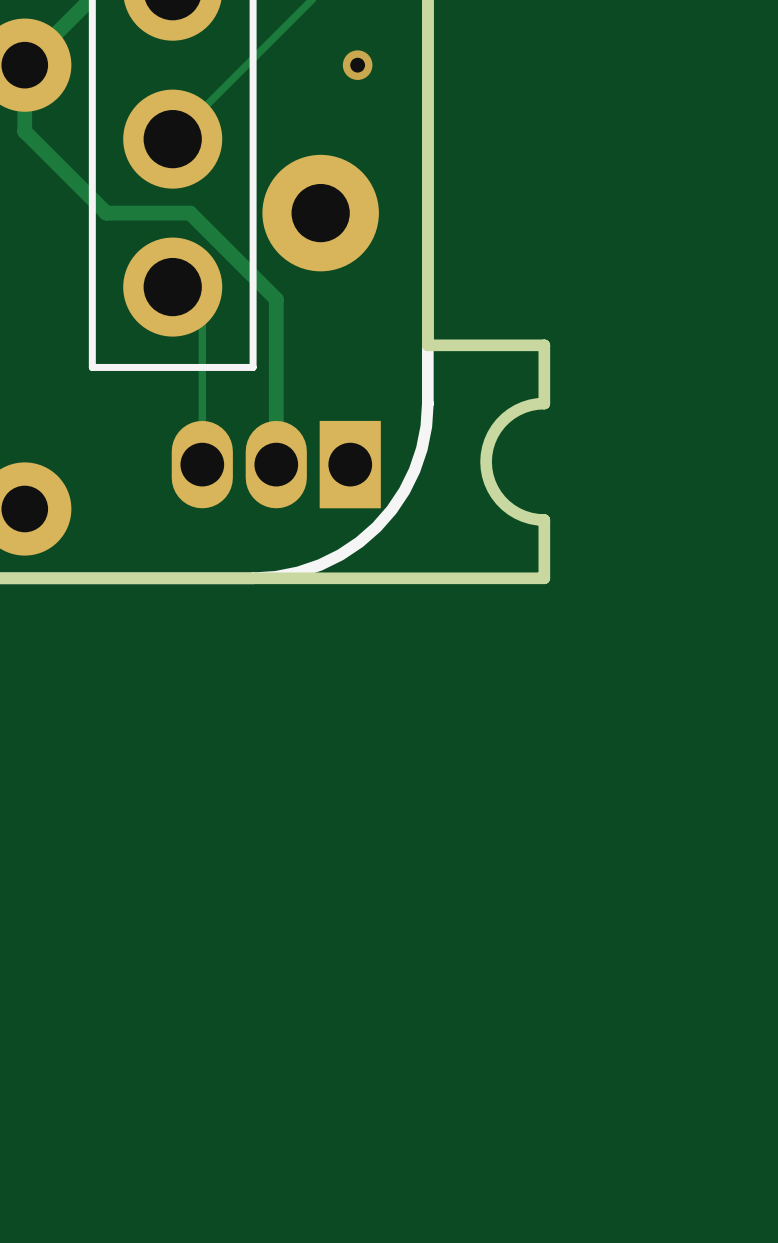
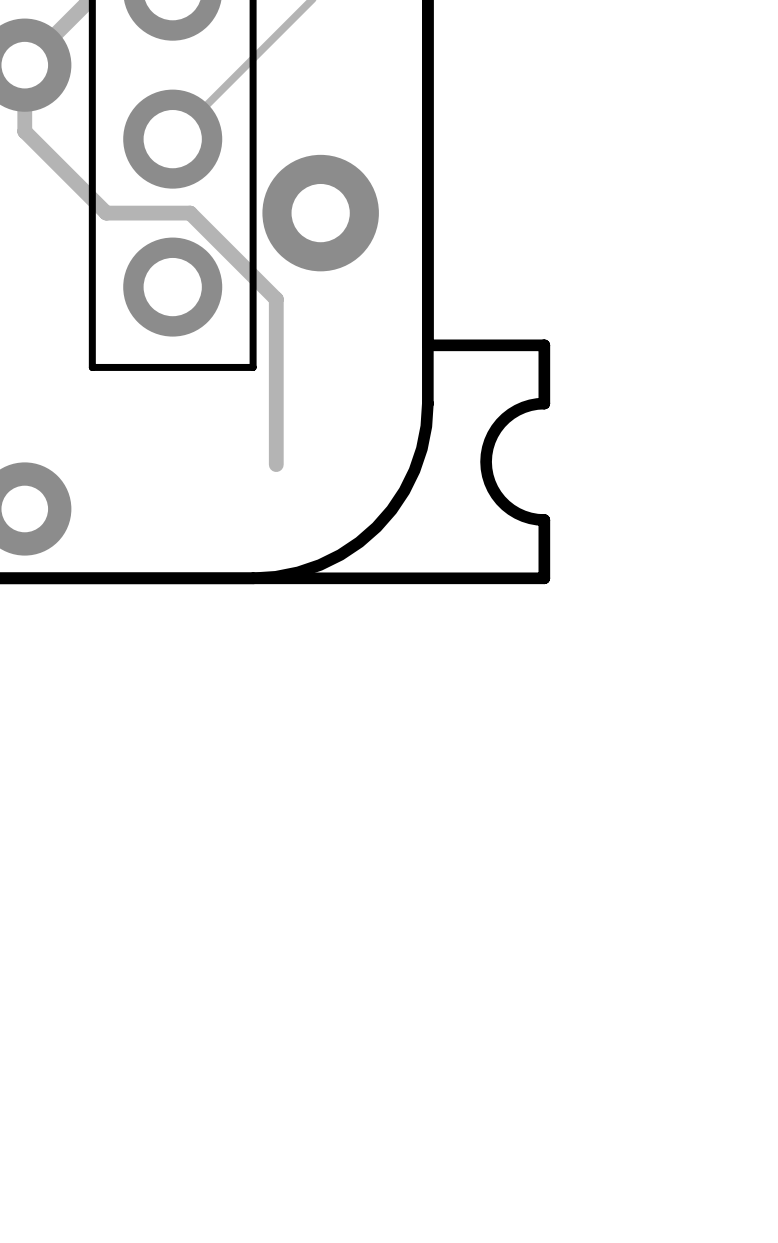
via: (357, 65) -> none
track: (172, 287) (202, 316) (202, 464) -> none
part: (276, 464) -> none

